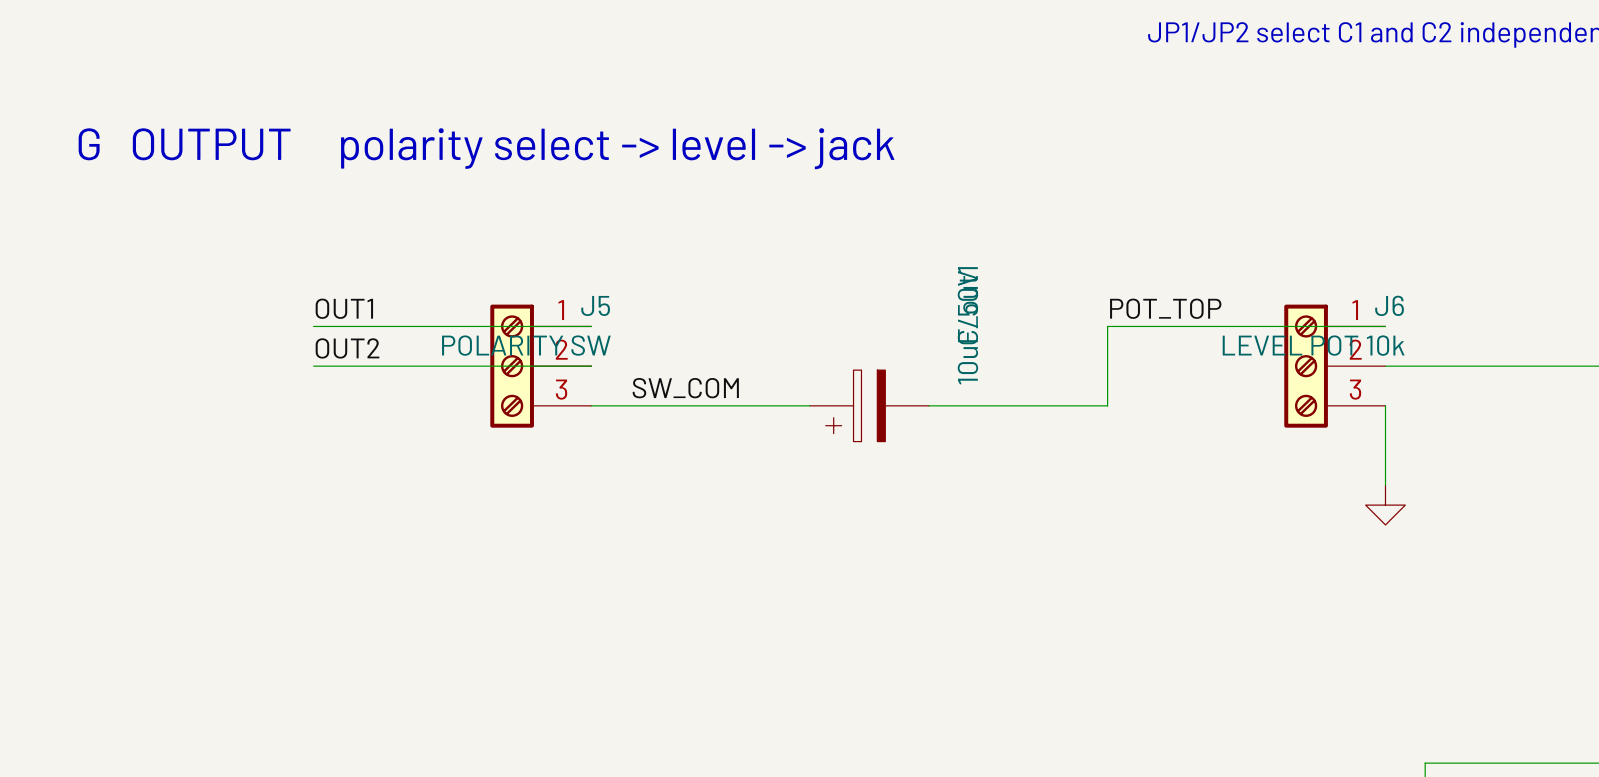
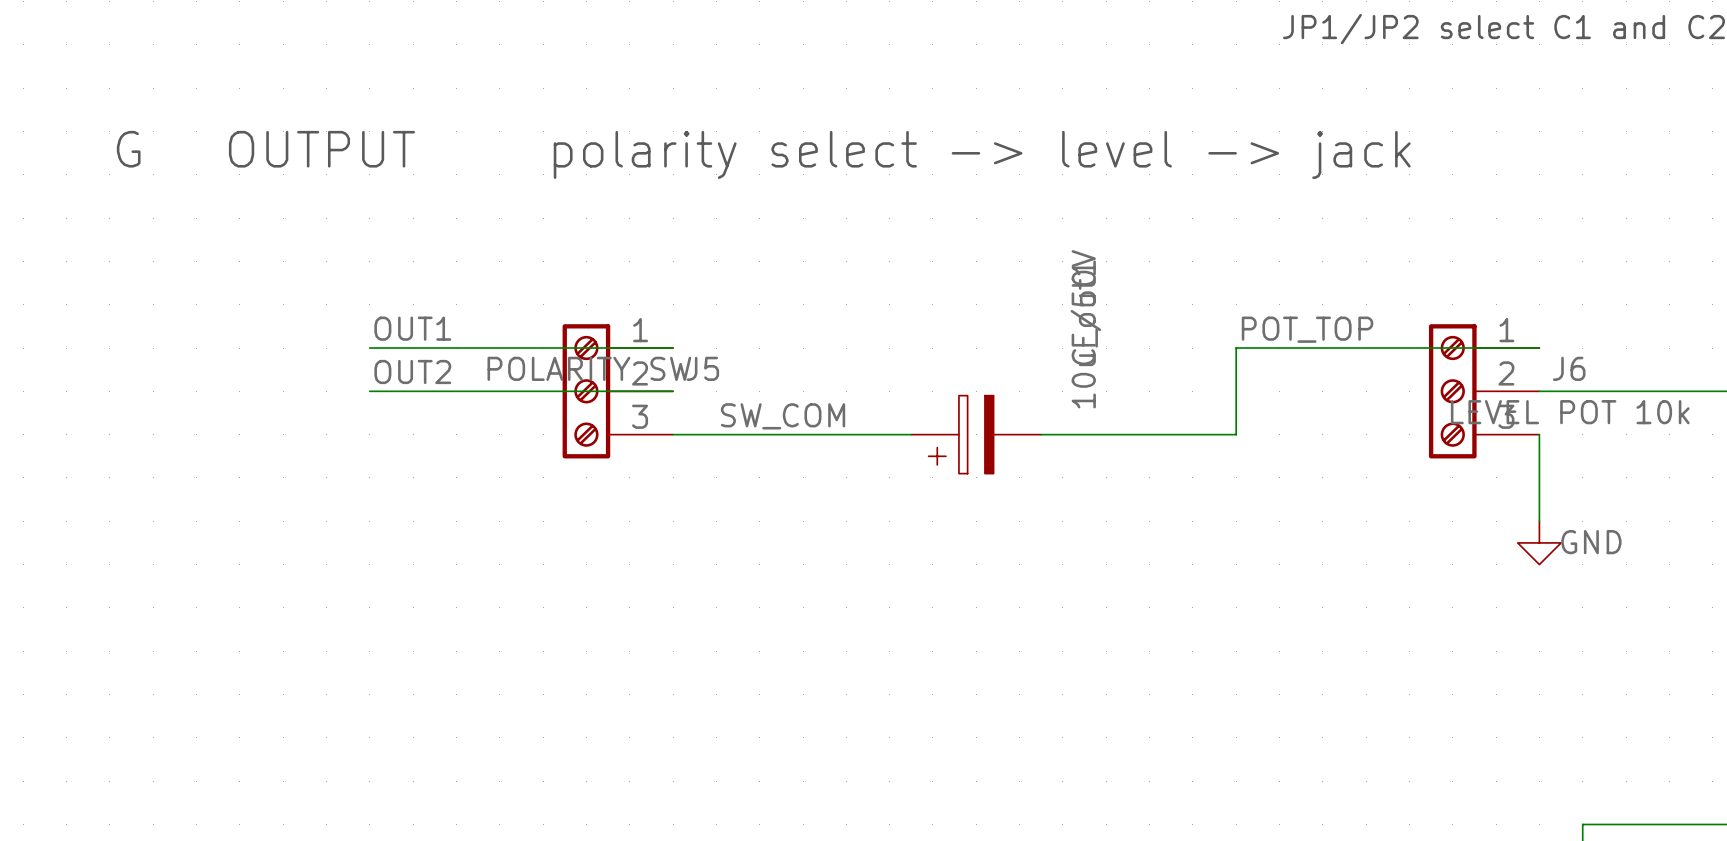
J5 name position: J5 (595, 305) -> J5 (702, 368)
J6 name position: J6 (1389, 305) -> J6 (1569, 368)
J6 value position: LEVEL POT 10k (1313, 345) -> LEVEL POT 10k (1570, 412)
power symbol text: none -> GND (1591, 542)

